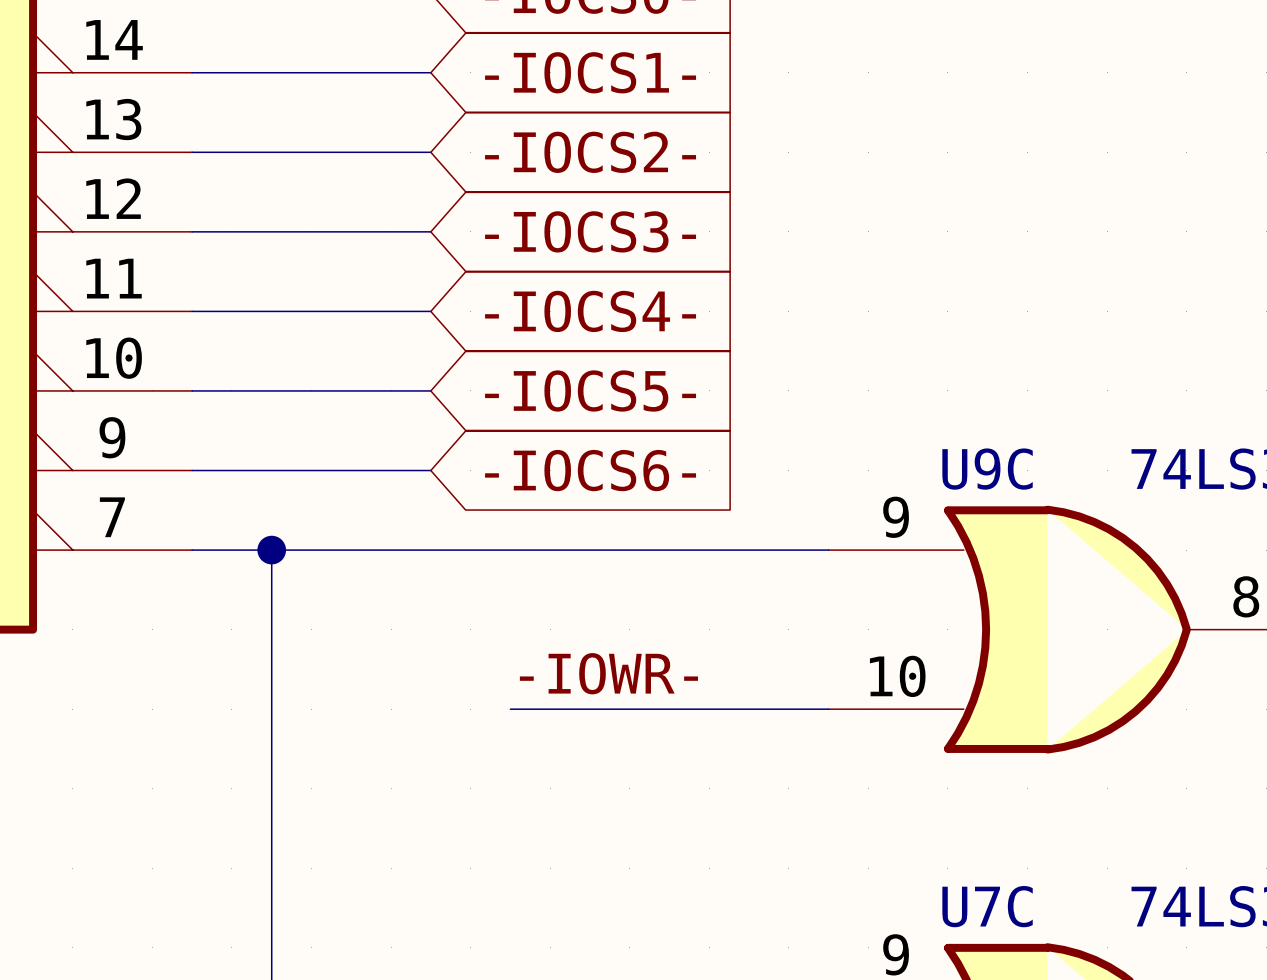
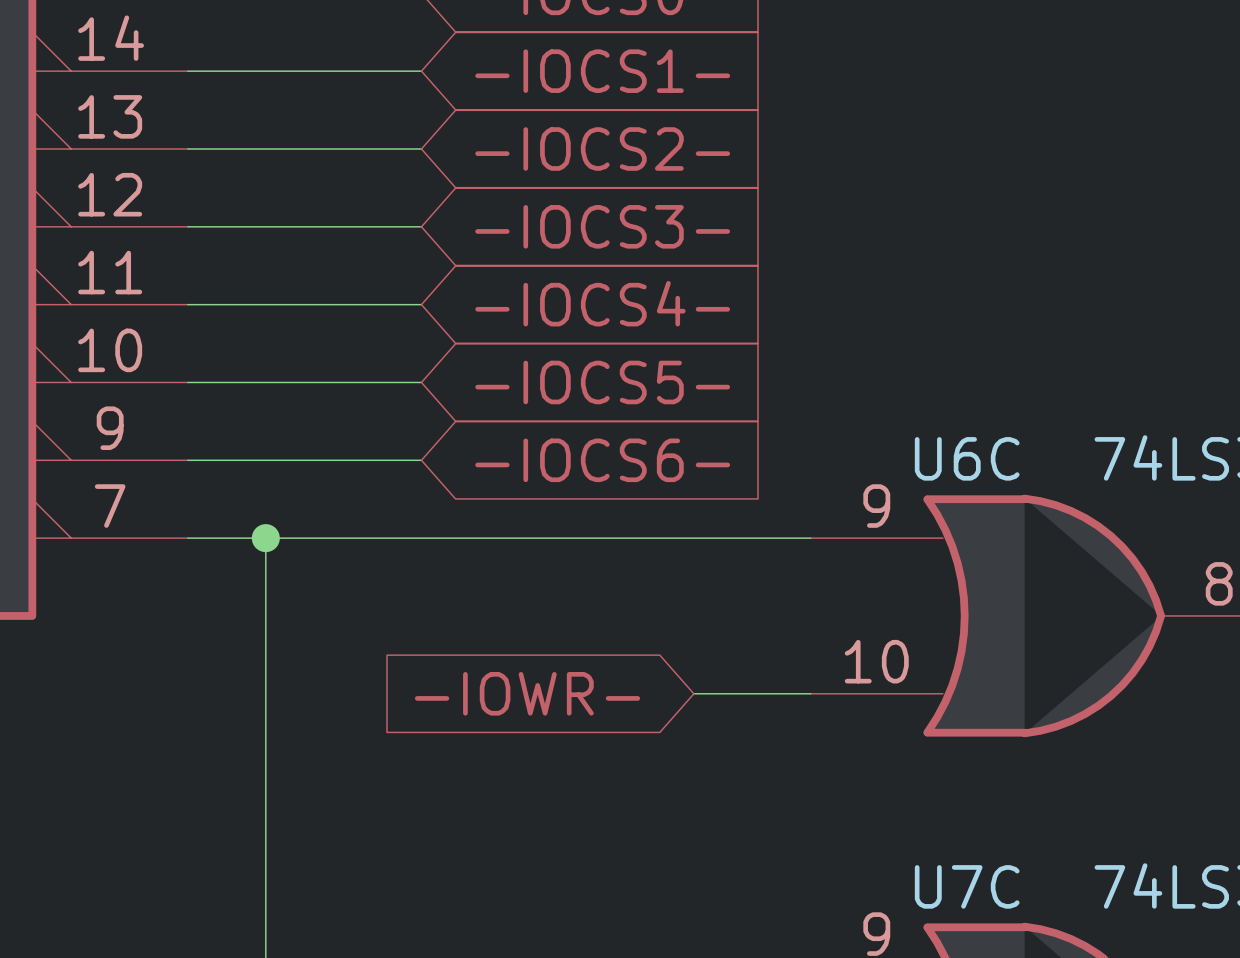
U9C name: U9C (987, 469) -> U6C (967, 458)
label: -IOWR- (608, 673) -> none
wire: (510, 709) (709, 709) -> none
global label: none -> -IOWR- (527, 693)

